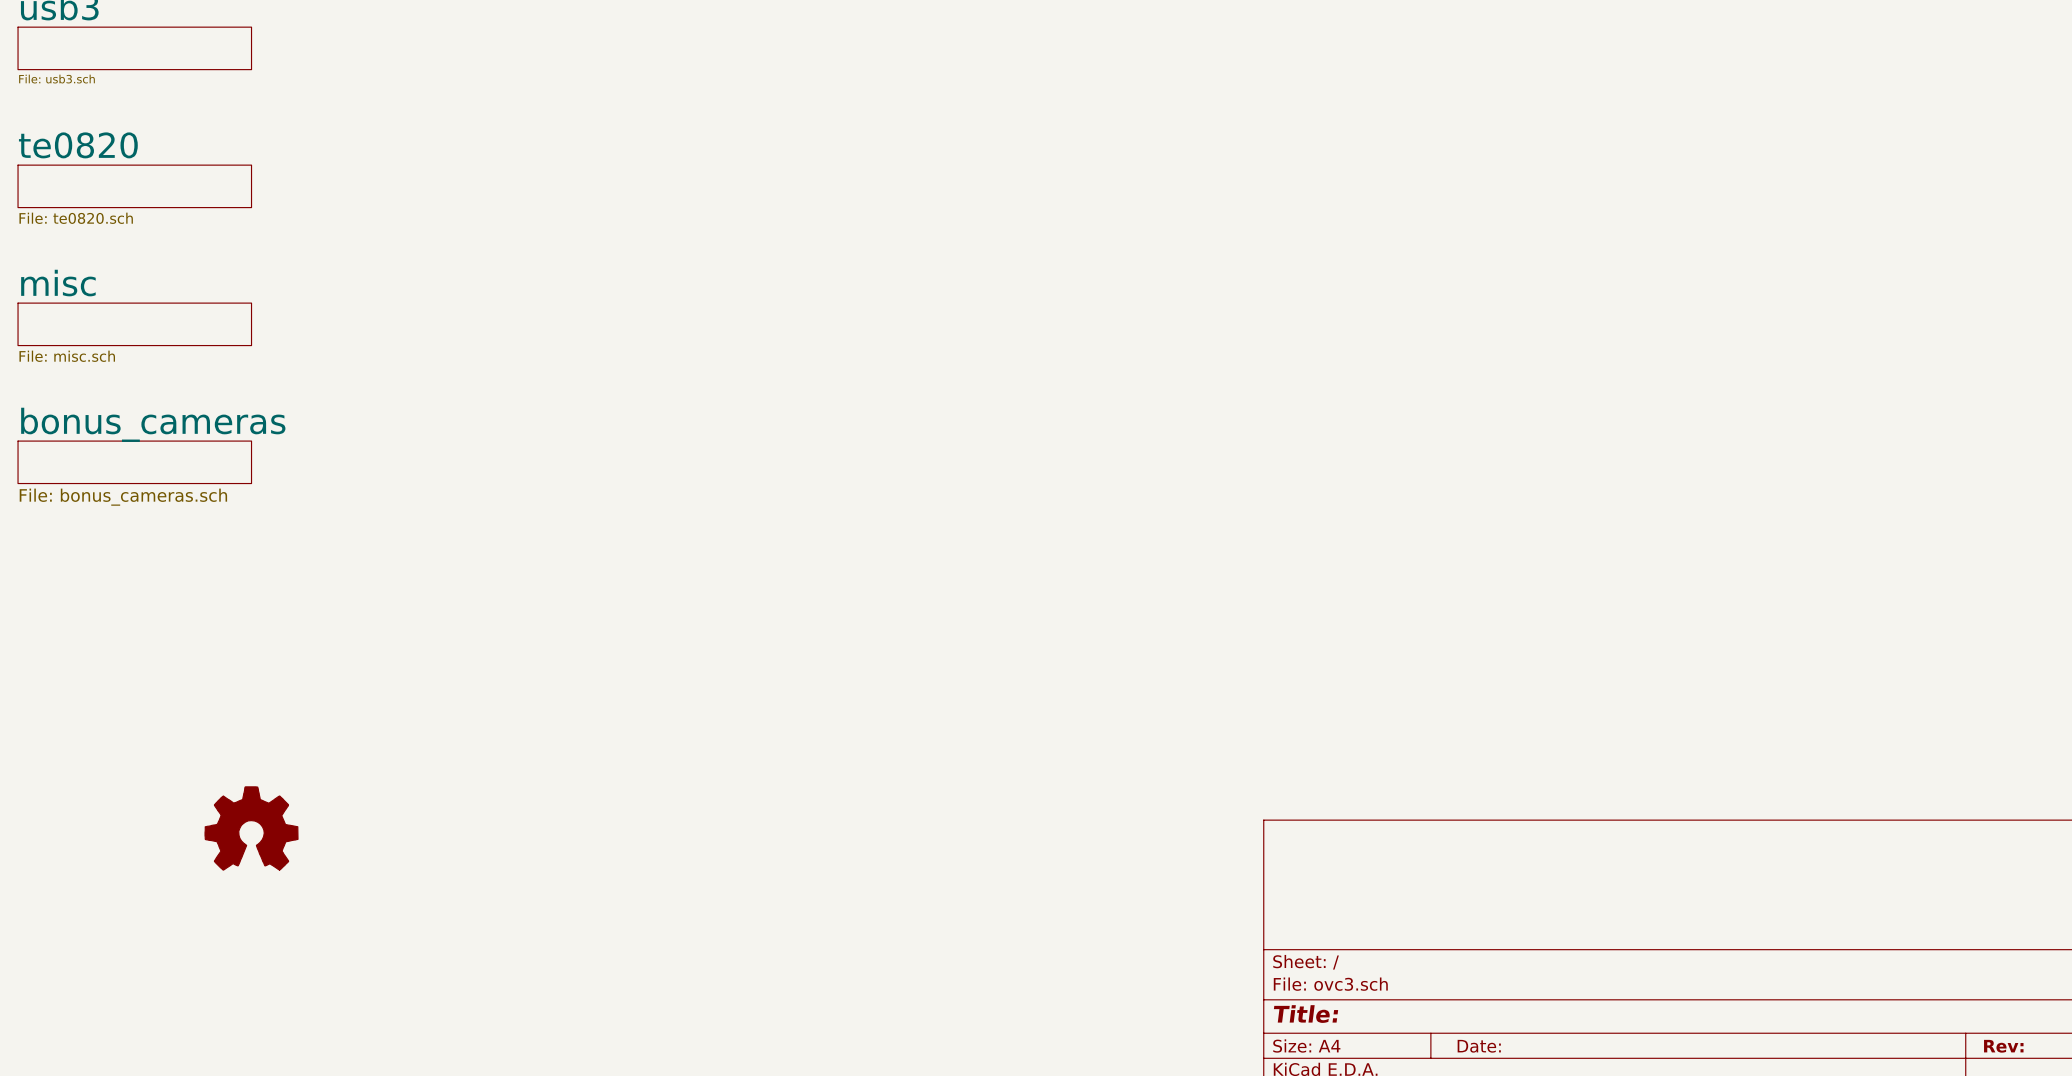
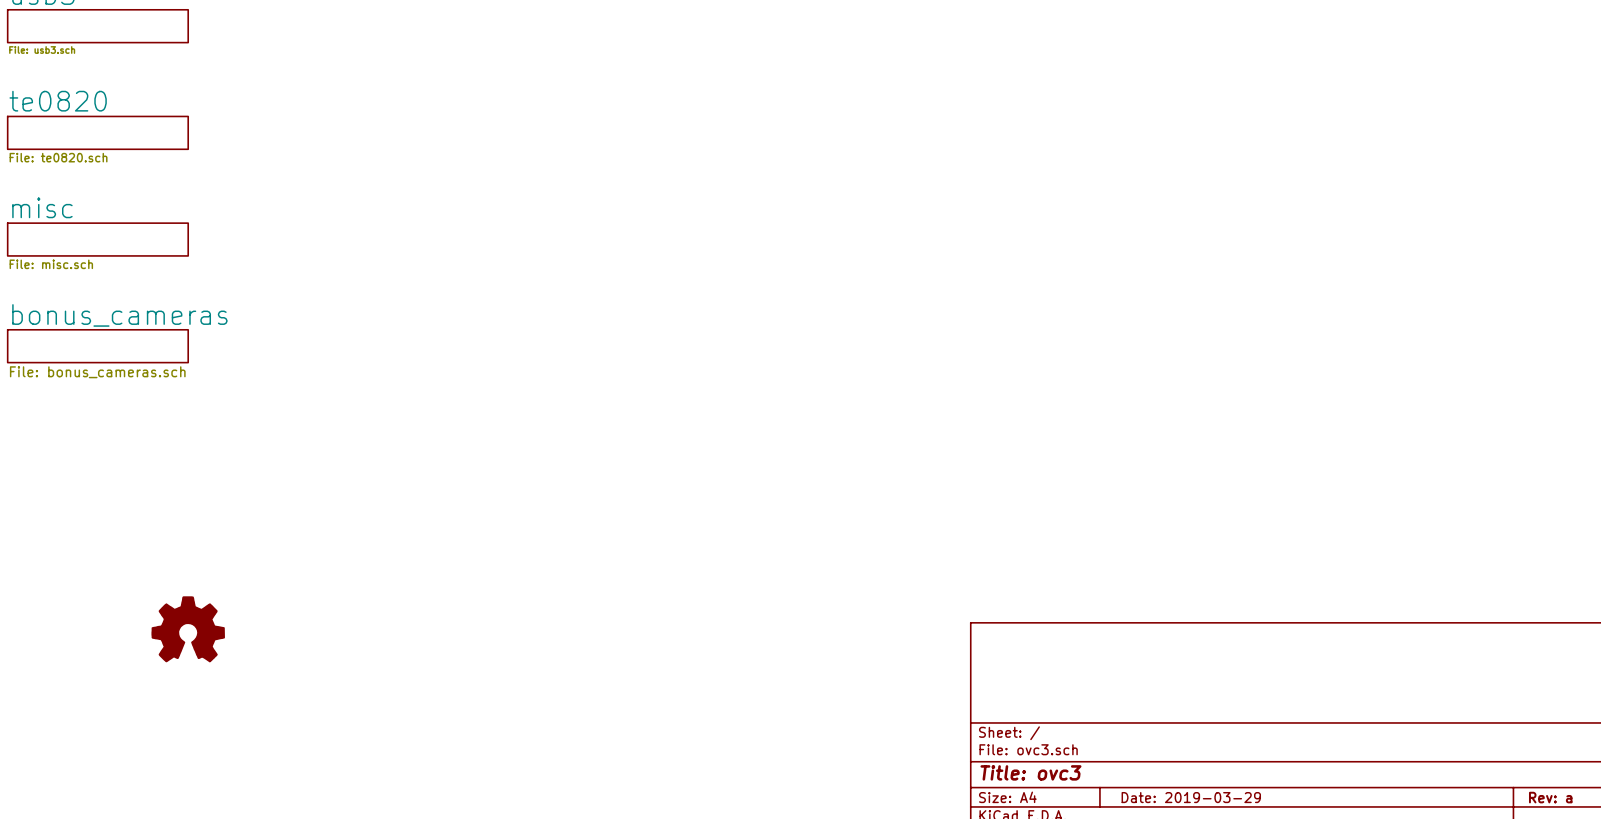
title block: Title: (1306, 1014) -> Title: ovc3 (1030, 772)
title block: Date: (1479, 1046) -> Date: 2019-03-29 (1191, 797)
title block: Rev: (2003, 1046) -> Rev: a (1550, 797)

